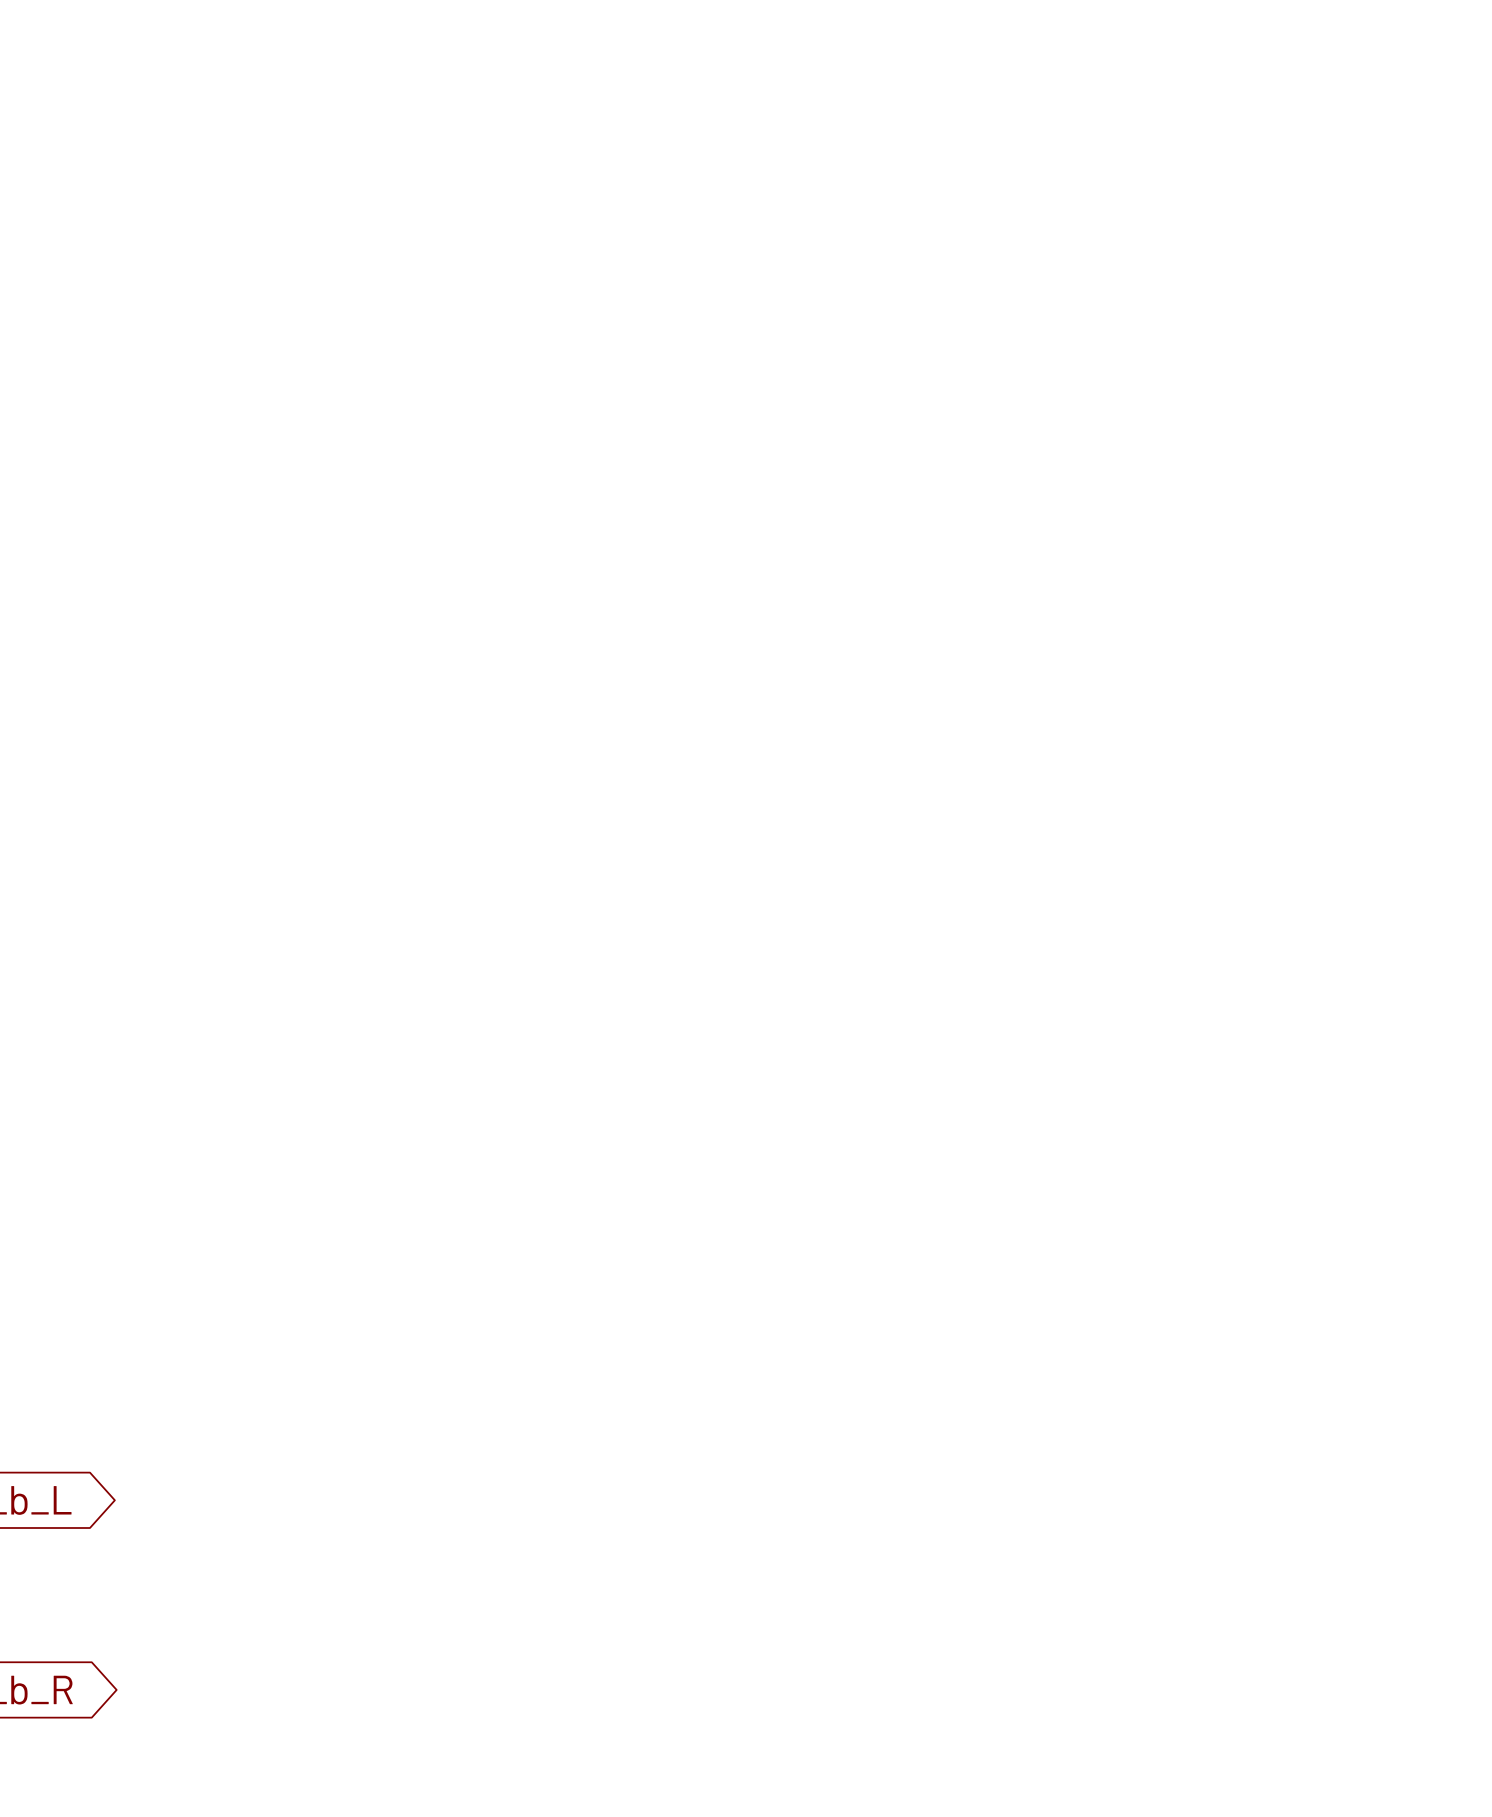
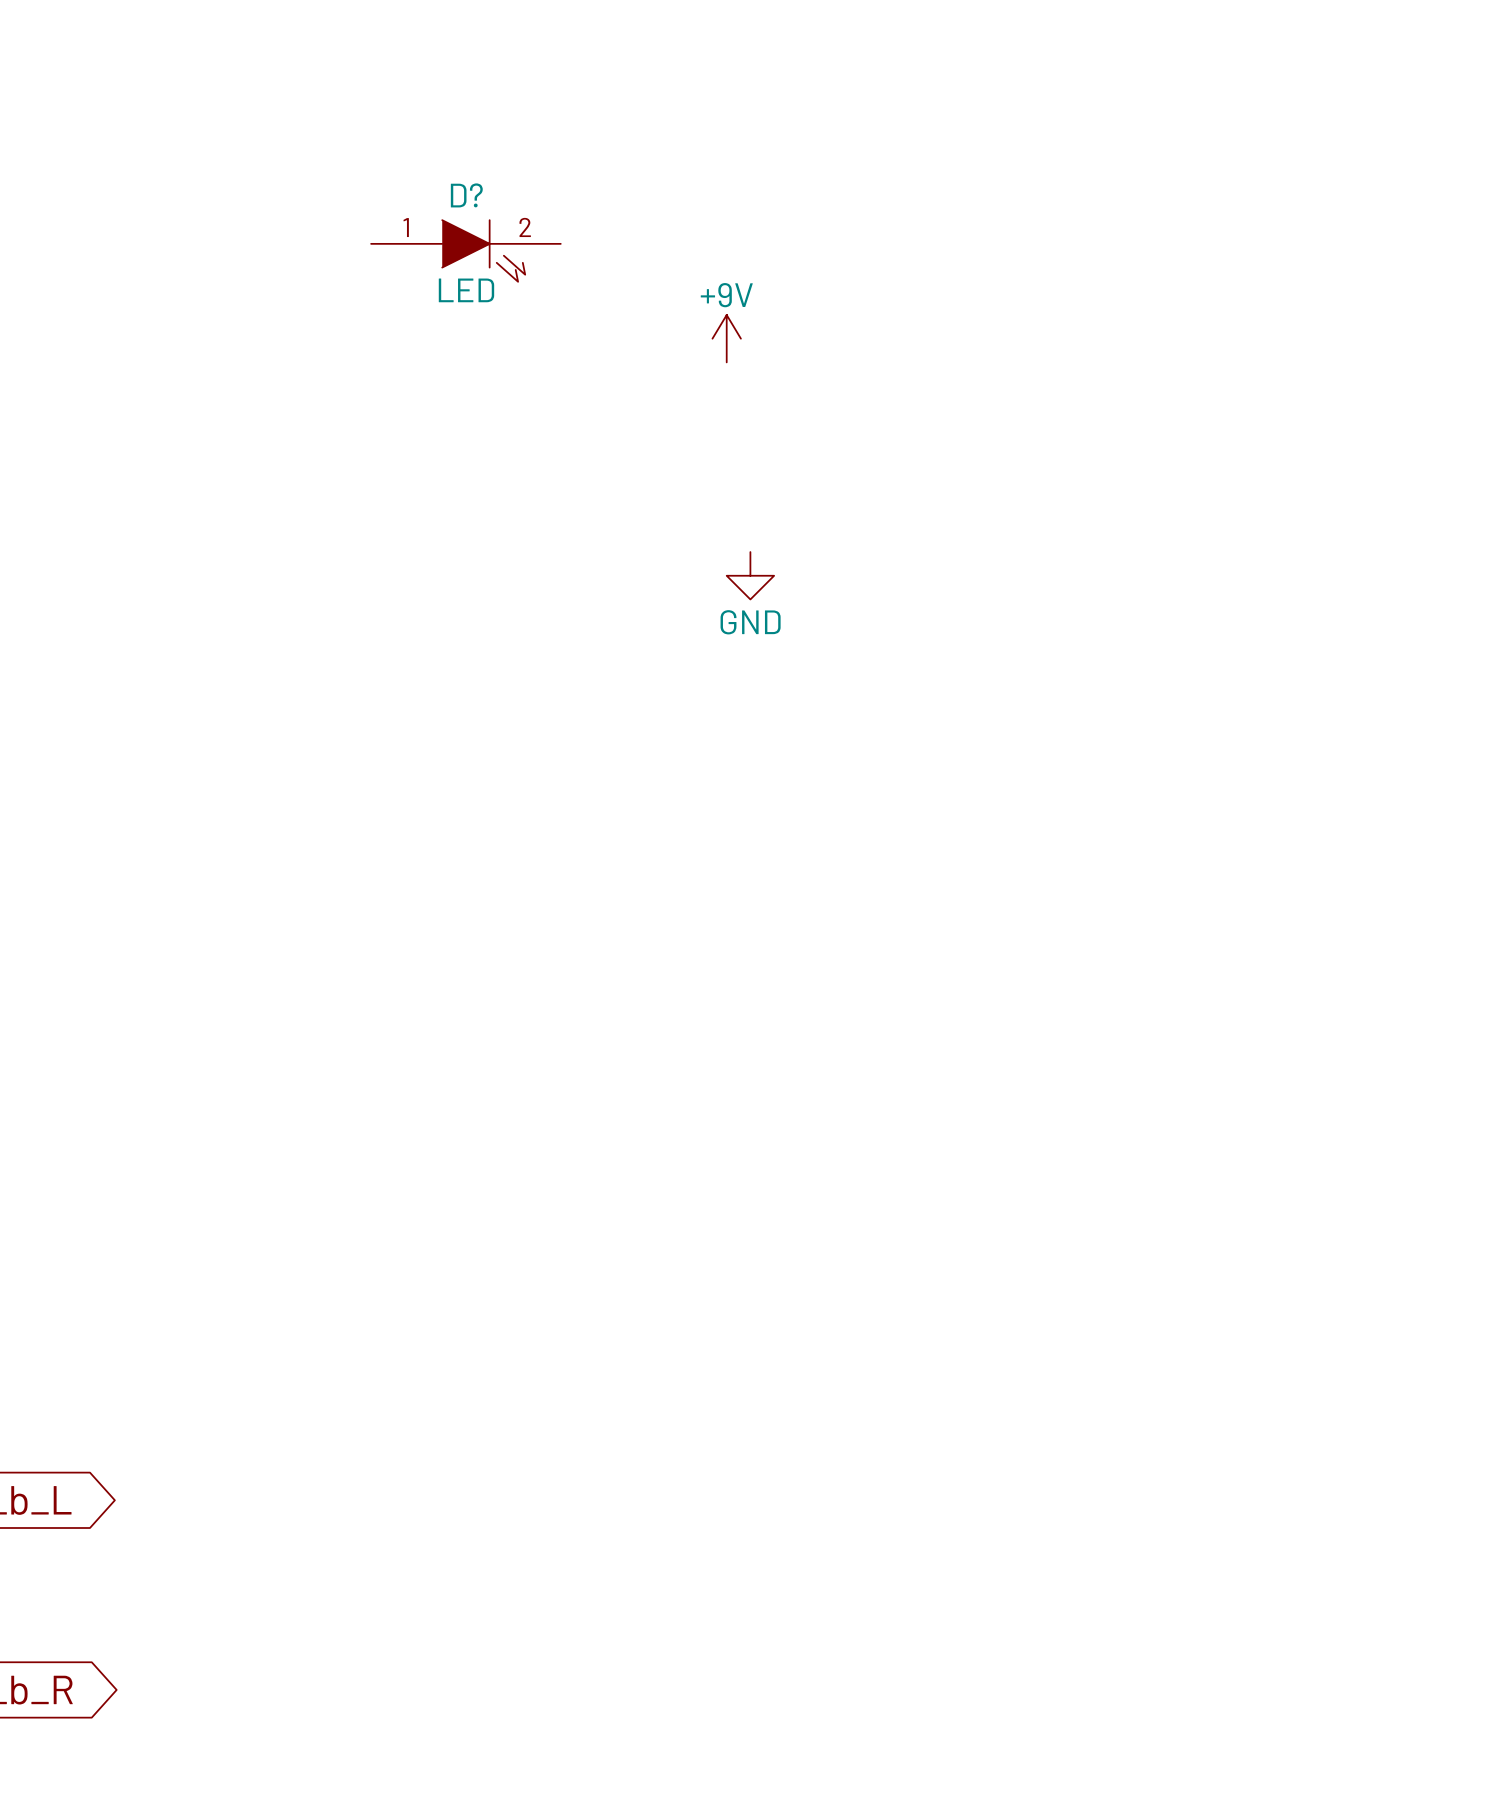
D?: none -> LED (465, 250)
power symbol: none -> +9V (726, 338)
power symbol: none -> GND (750, 575)

